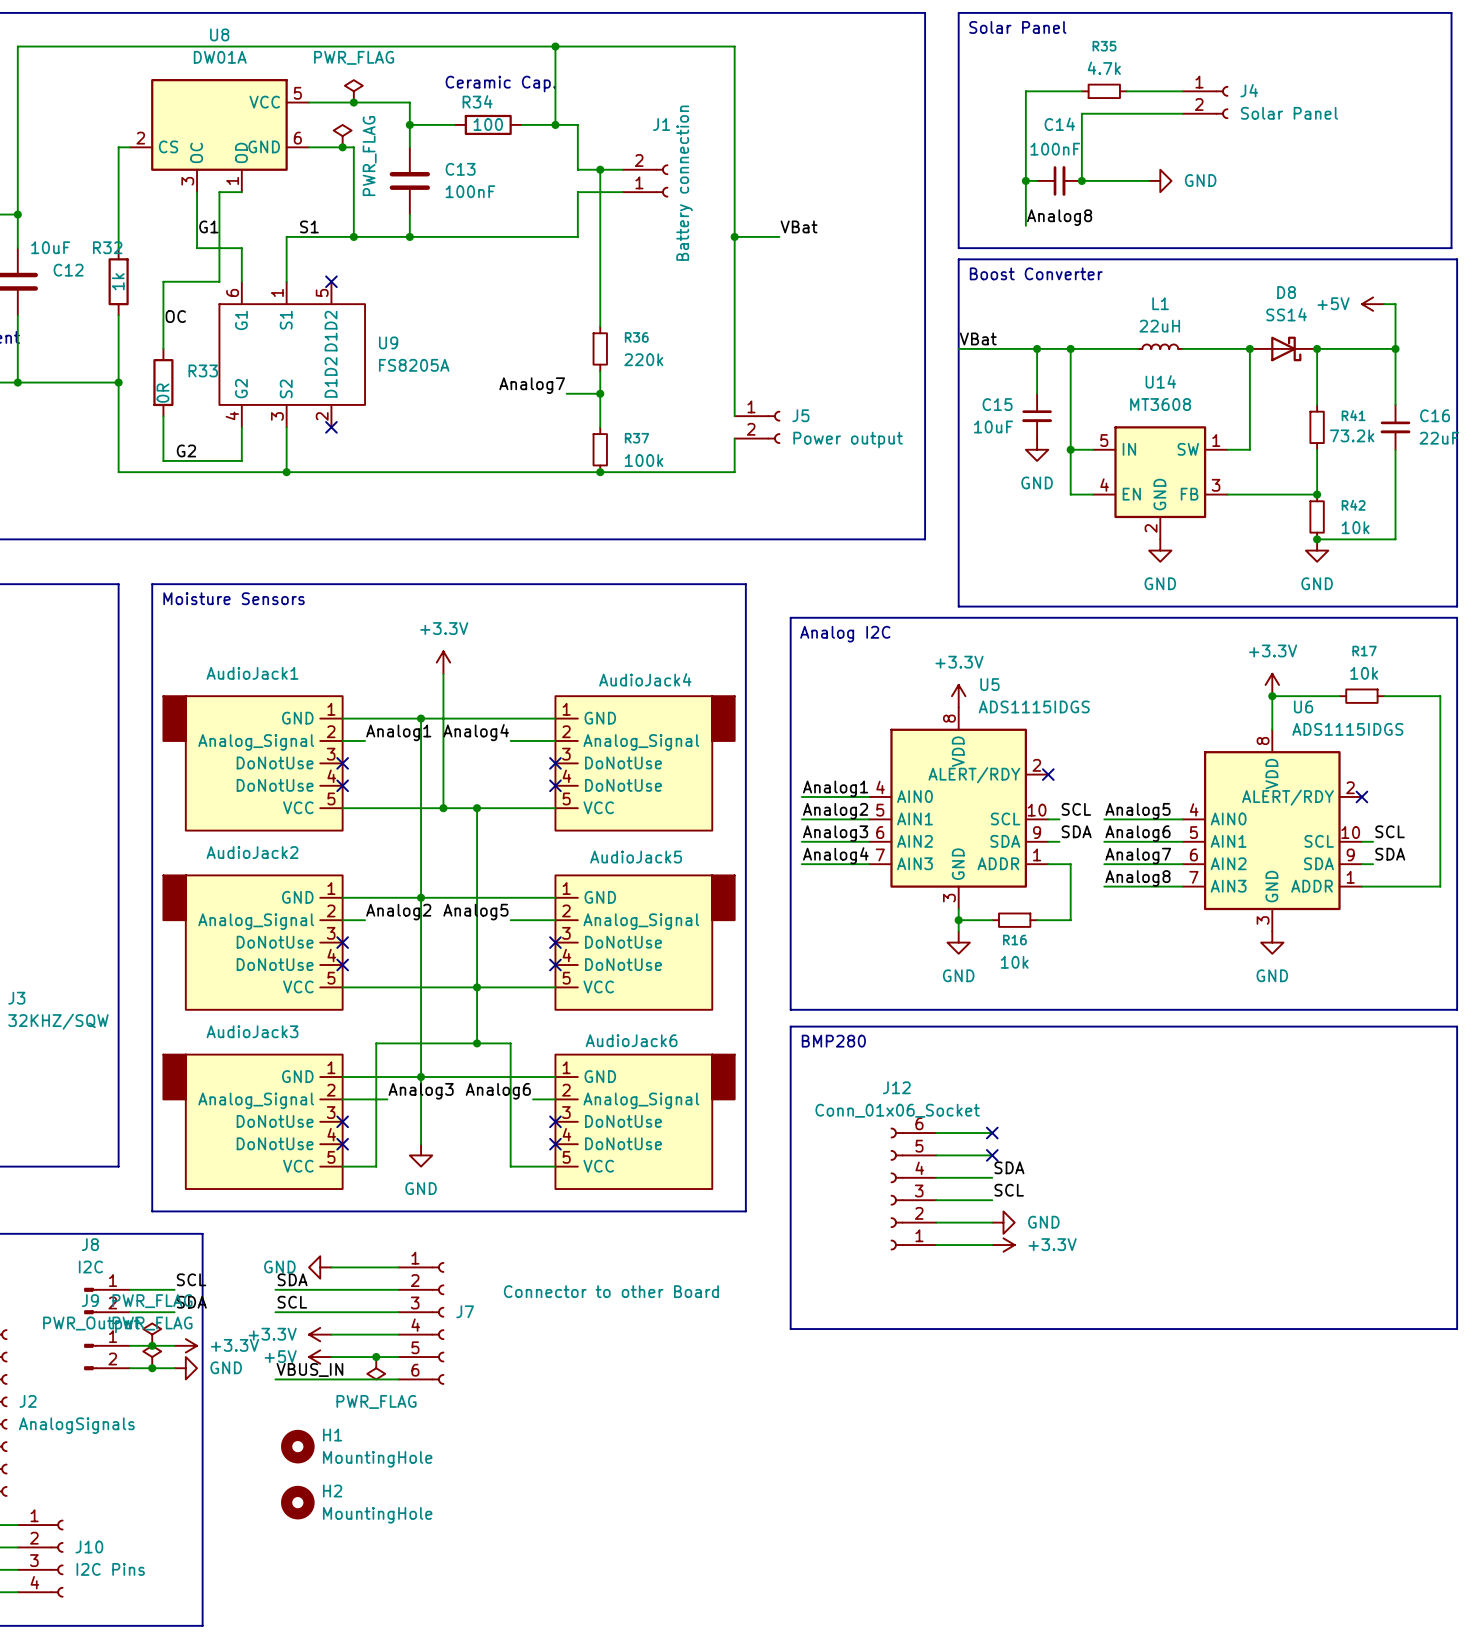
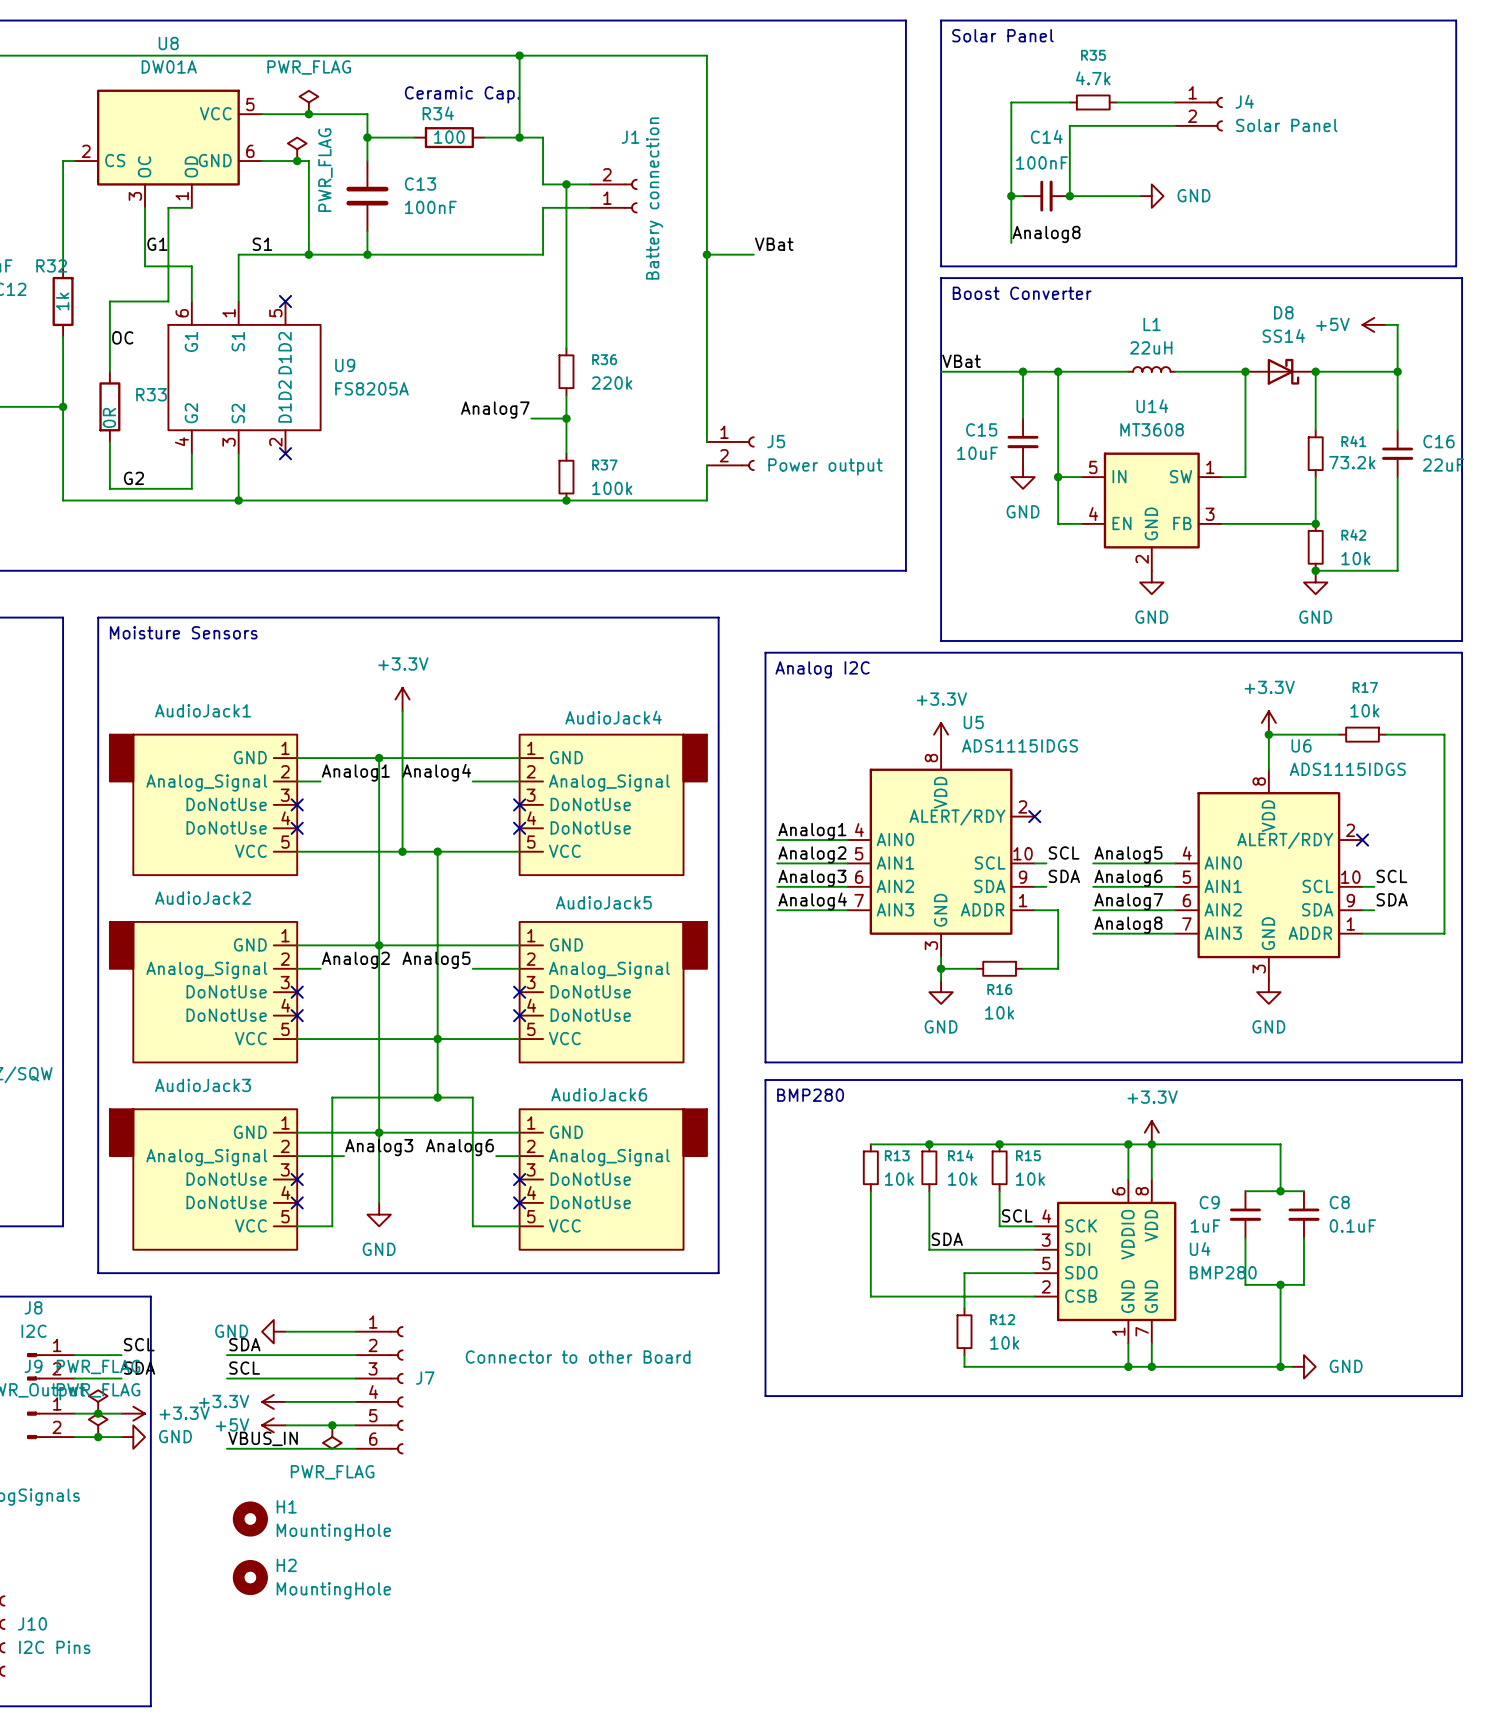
power symbol: none -> +3.3V (1151, 1132)
wire: none -> (870, 1144) (1280, 1144) (1280, 1191)
junction: none -> (929, 1144)
junction: none -> (999, 1144)
wire: none -> (1128, 1144) (1128, 1179)
junction: none -> (1128, 1144)
wire: none -> (1151, 1144) (1151, 1179)
junction: none -> (1151, 1144)
R13: none -> 10k (870, 1167)
R14: none -> 10k (929, 1167)
R15: none -> 10k (999, 1167)
wire: none -> (870, 1191) (870, 1296) (1034, 1296)
wire: (936, 1133) (992, 1133) -> none
wire: none -> (929, 1191) (929, 1249) (1034, 1249)
no-connect mark: (992, 1133) -> none
wire: none -> (999, 1191) (999, 1226) (1034, 1226)
wire: none -> (1245, 1191) (1303, 1191)
junction: none -> (1280, 1191)
wire: (936, 1155) (992, 1155) -> none
no-connect mark: (992, 1155) -> none
C9: none -> 1uF (1245, 1214)
C8: none -> 0.1uF (1303, 1214)
label position: SDA (1009, 1167) -> SDA (947, 1239)
wire: (936, 1177) (992, 1177) -> none
wire: none -> (1245, 1238) (1245, 1284) (1303, 1284) (1303, 1238)
J12: Conn_01x06_Socket (913, 1189) -> none
label position: SCL (1009, 1190) -> SCL (1017, 1215)
wire: (936, 1200) (992, 1200) -> none
U4: none -> BMP280 (1105, 1261)
wire: none -> (1034, 1273) (964, 1273) (964, 1308)
wire: (936, 1222) (992, 1222) -> none
power symbol: GND (1003, 1222) -> none
wire: none -> (1280, 1284) (1280, 1366)
junction: none -> (1280, 1284)
wire: (936, 1245) (992, 1245) -> none
power symbol: +3.3V (1003, 1245) -> none
R12: none -> 10k (964, 1331)
wire: none -> (1128, 1343) (1128, 1366)
wire: none -> (1151, 1343) (1151, 1366)
wire: none -> (964, 1355) (964, 1366) (1292, 1366)
junction: none -> (1128, 1366)
junction: none -> (1151, 1366)
junction: none -> (1280, 1366)
power symbol: none -> GND (1303, 1366)

